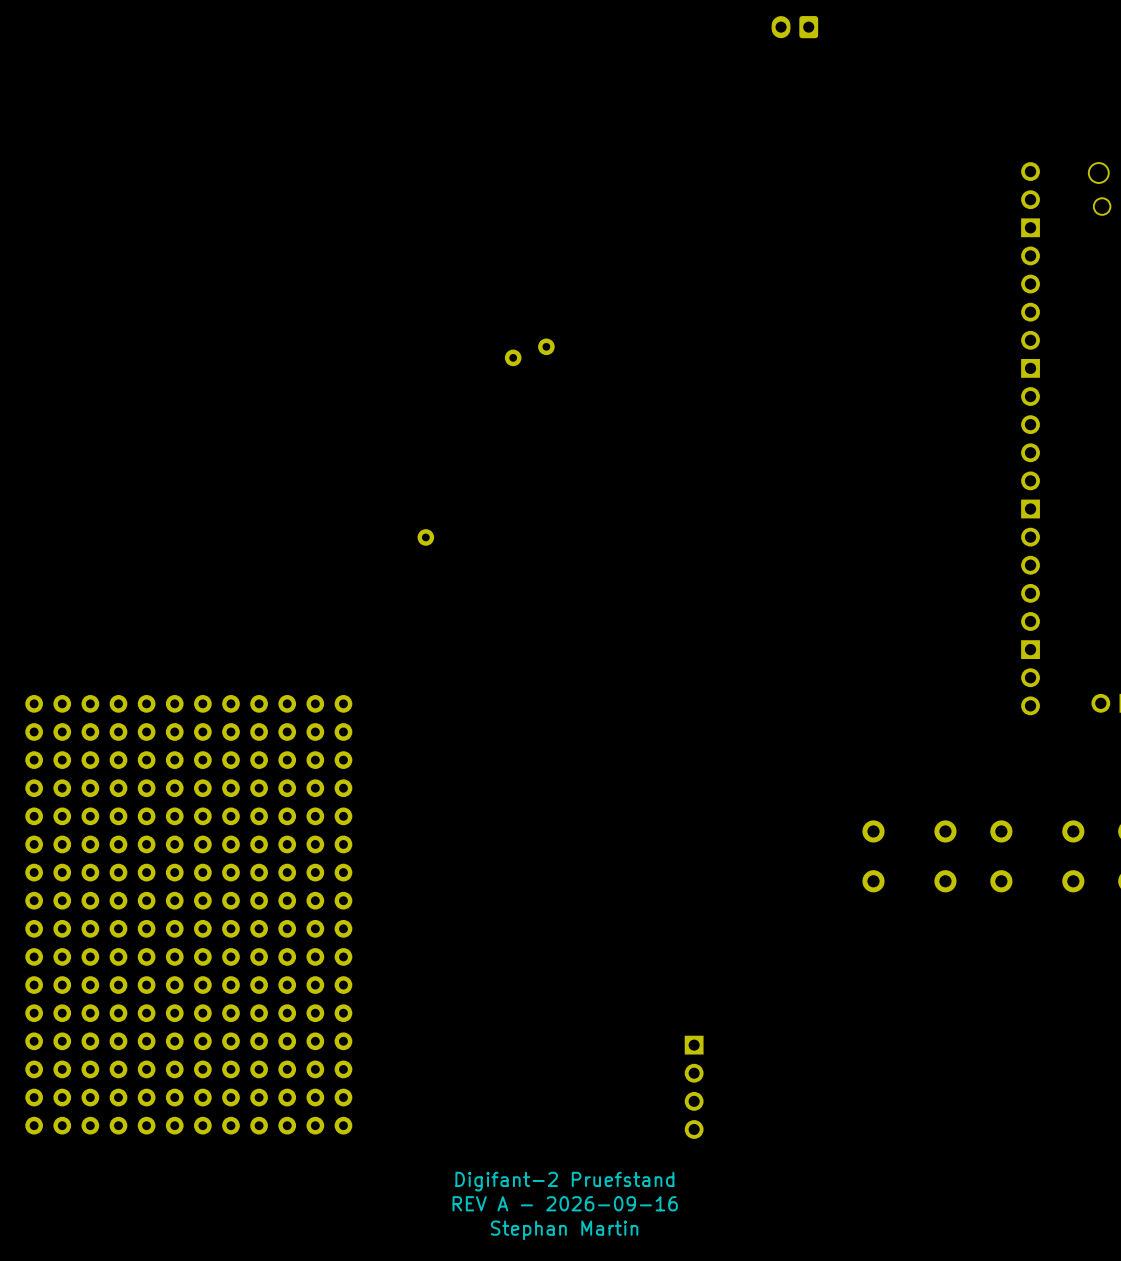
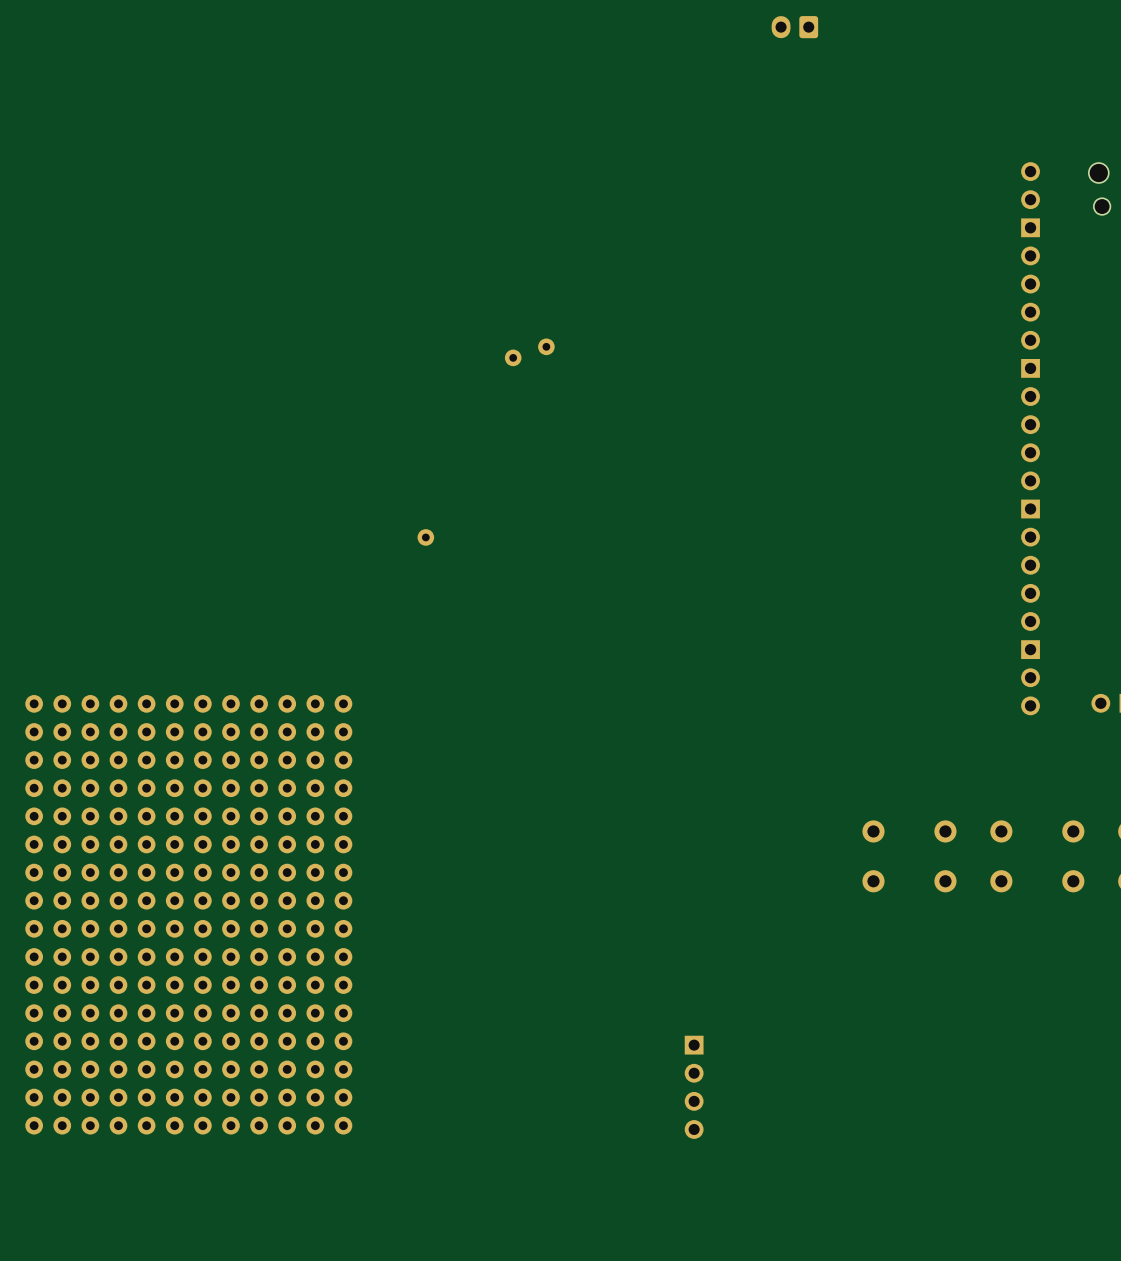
text: Digifant-2 Pruefstand (564, 1181) -> none
text: REV A - 2026-09-16 (565, 1203) -> none
text: Stephan Martin (564, 1230) -> none

